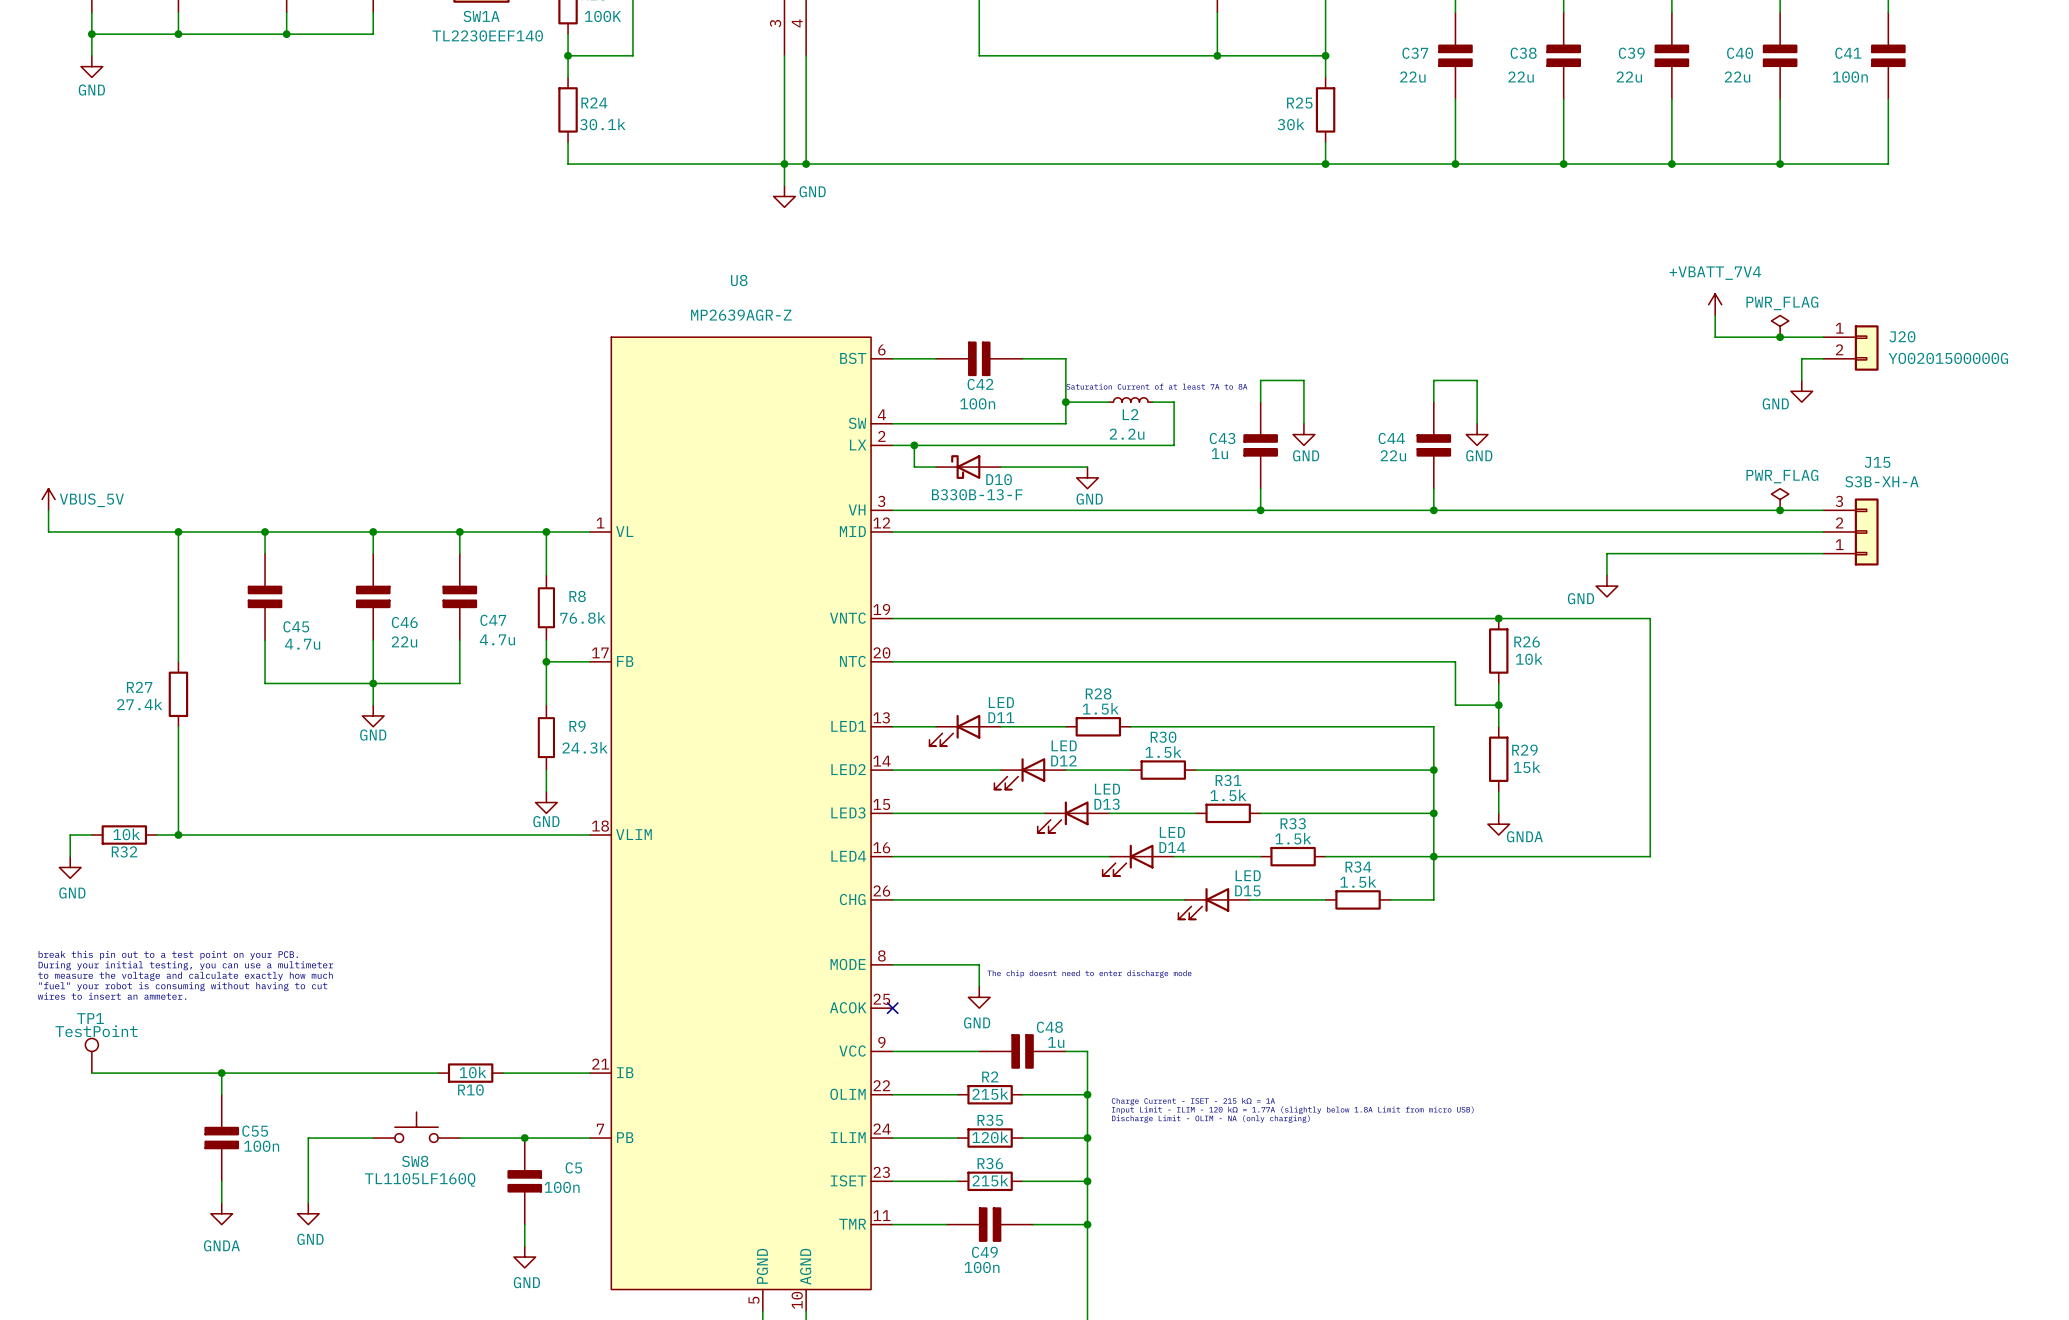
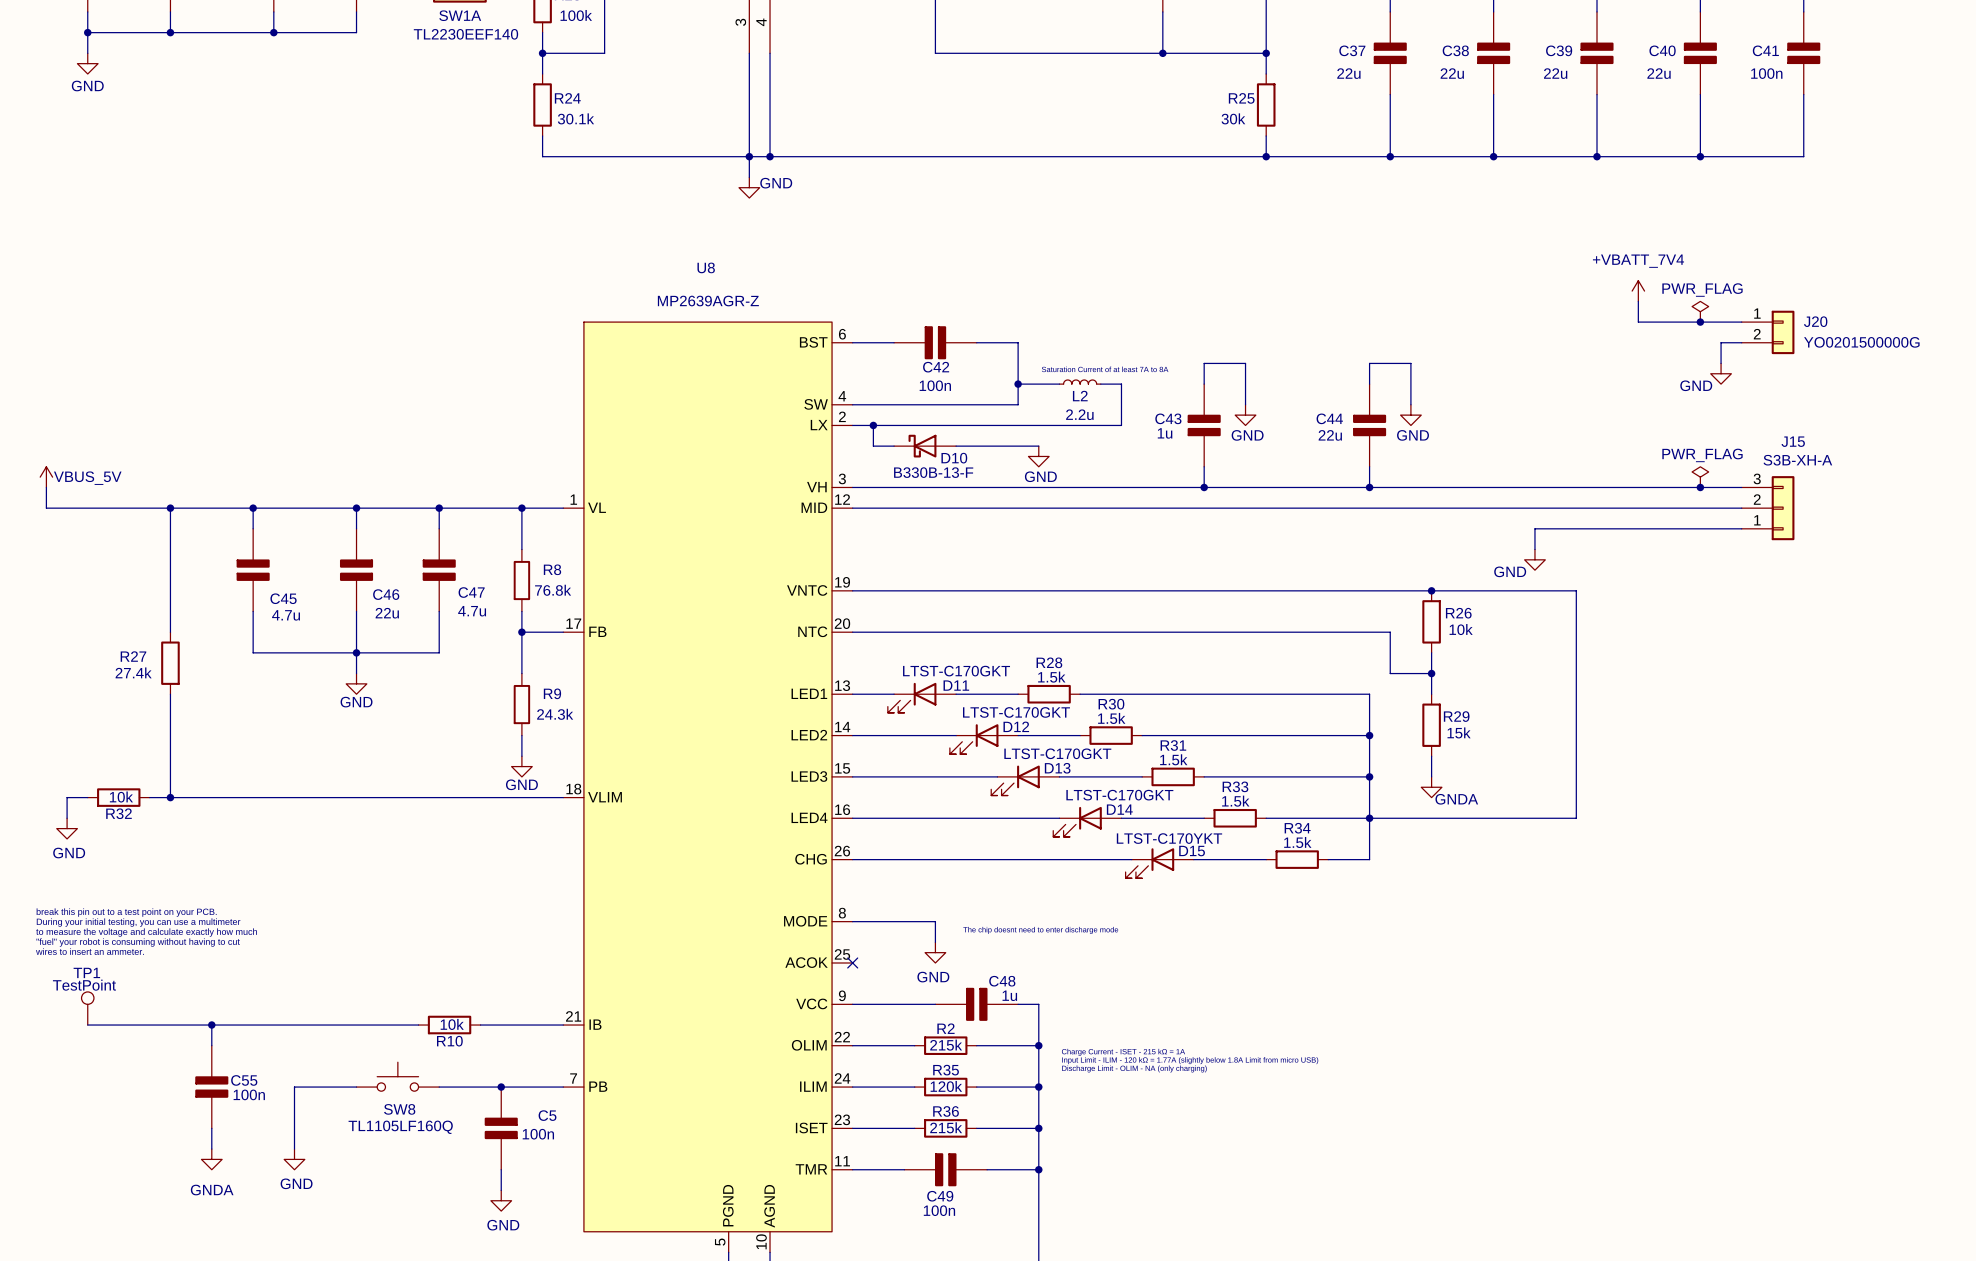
part value: 100K (602, 16) -> 100k (576, 15)
D11 value: LED (1001, 702) -> LTST-C170GKT (956, 671)
D12 value: LED (1064, 745) -> LTST-C170GKT (1016, 712)
D13 value: LED (1107, 789) -> LTST-C170GKT (1057, 753)
D14 value: LED (1172, 832) -> LTST-C170GKT (1119, 795)
D15 value: LED (1248, 875) -> LTST-C170YKT (1169, 838)

